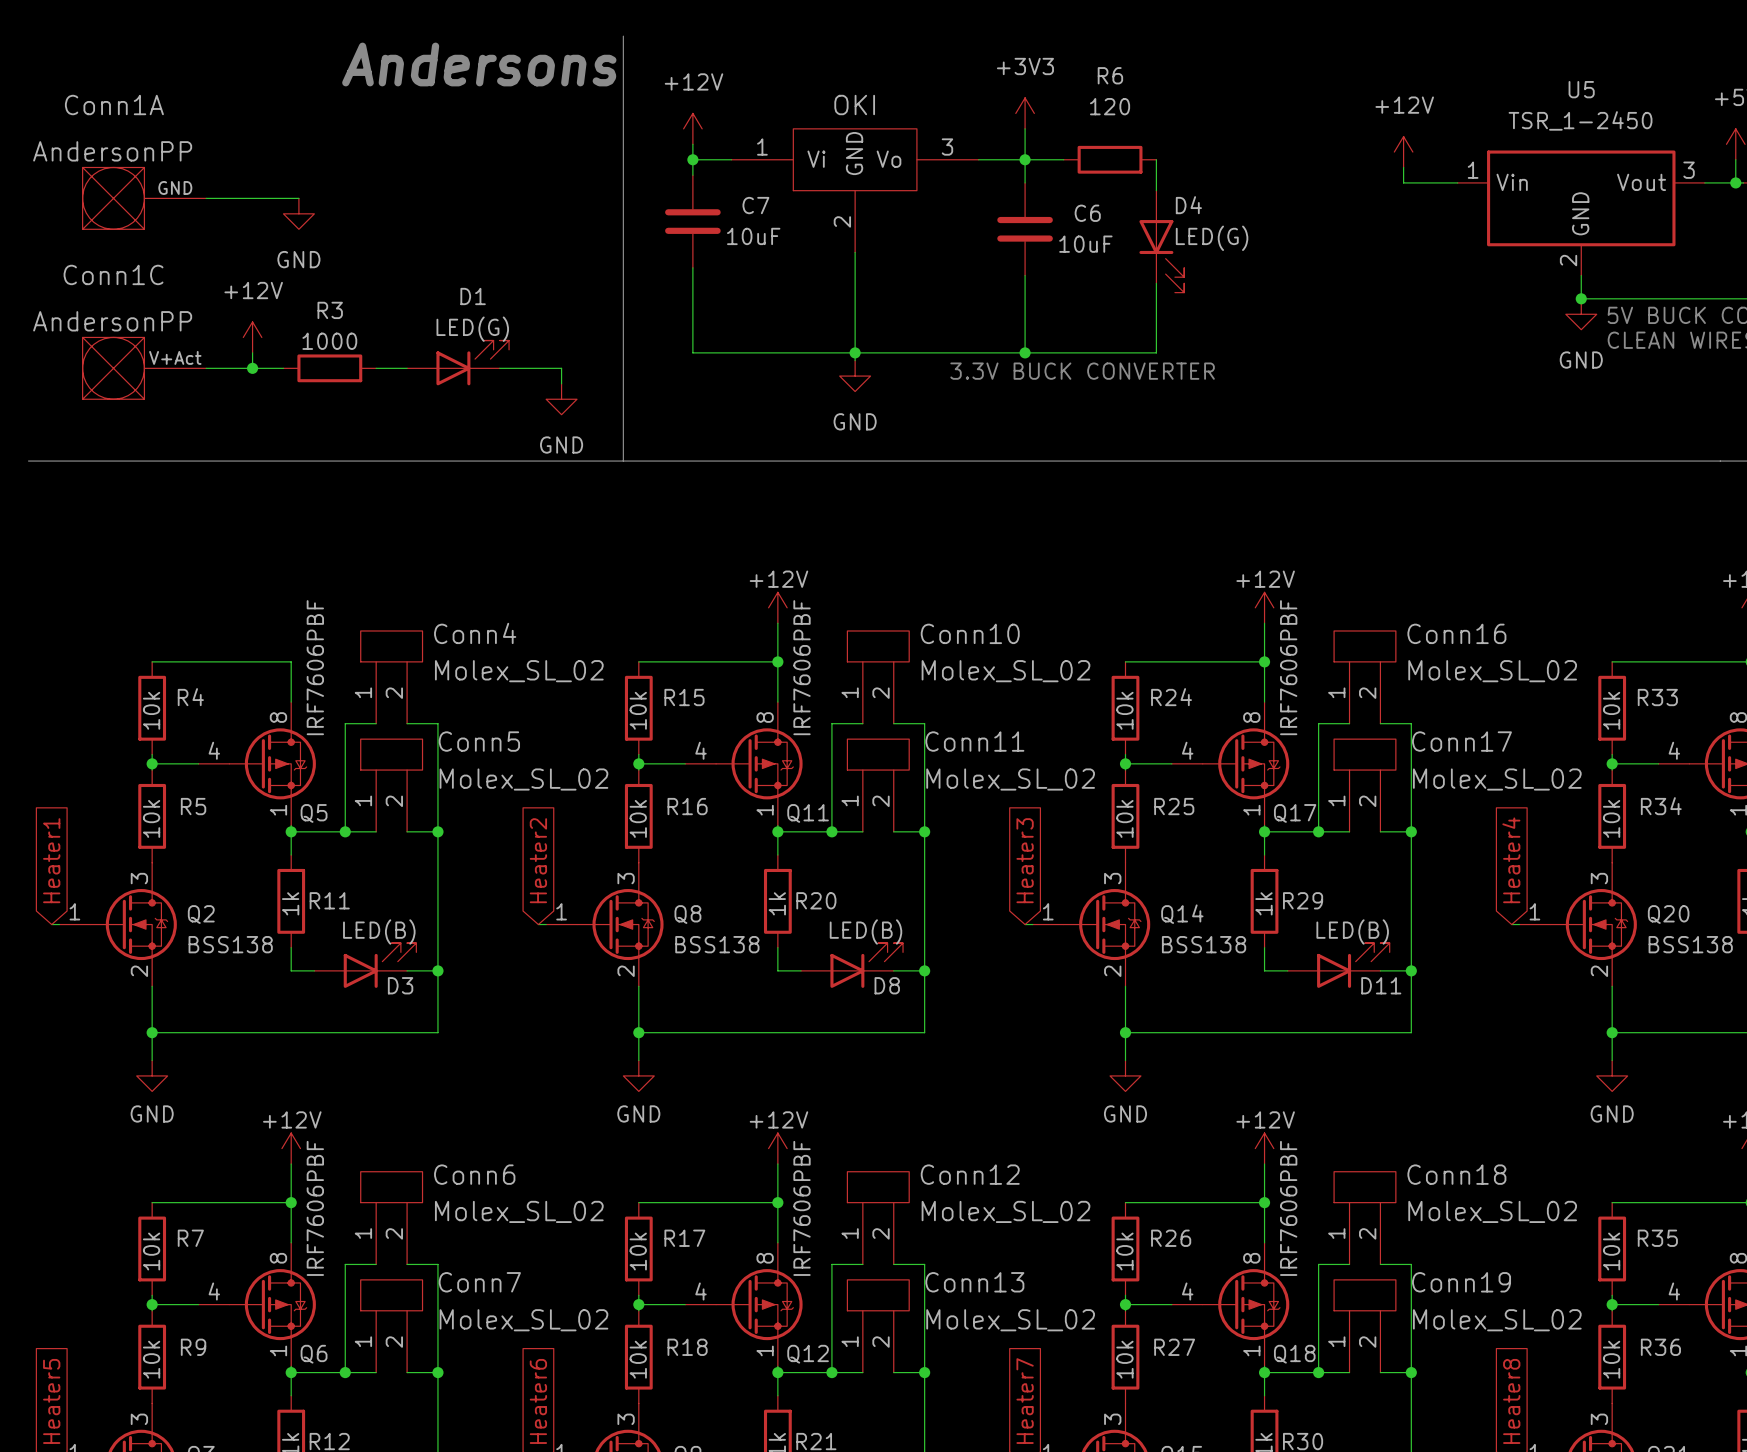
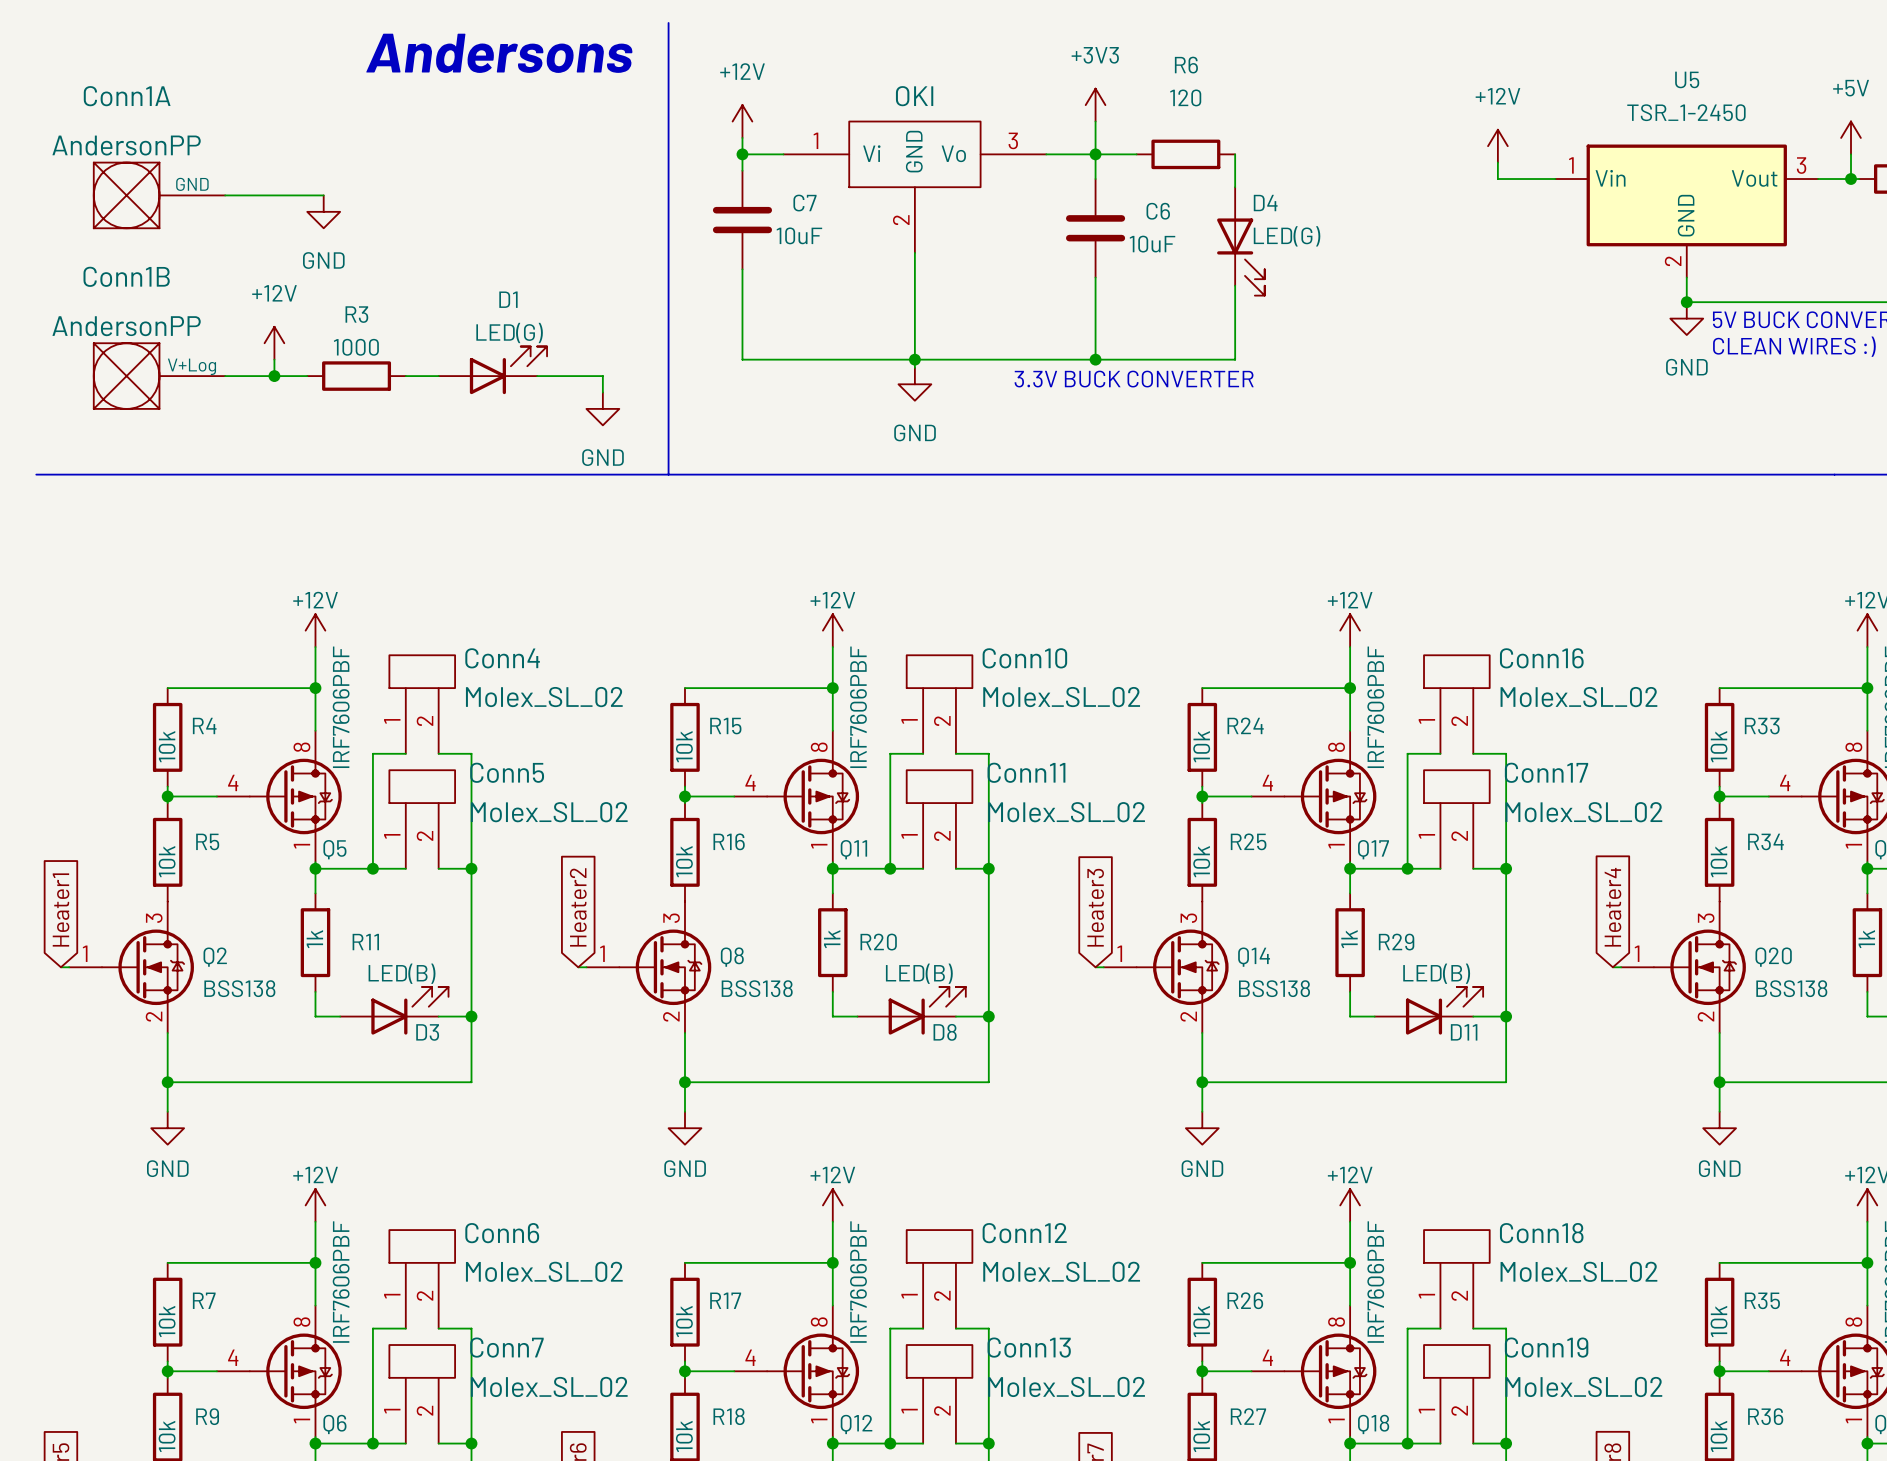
Conn1C name: Conn1C (113, 274) -> Conn1B (126, 276)
Conn1C pin name: V+Act (175, 357) -> V+Log (191, 366)
power symbol: none -> +12V (315, 630)
wire: none -> (315, 647) (315, 688)
junction: none -> (315, 688)

